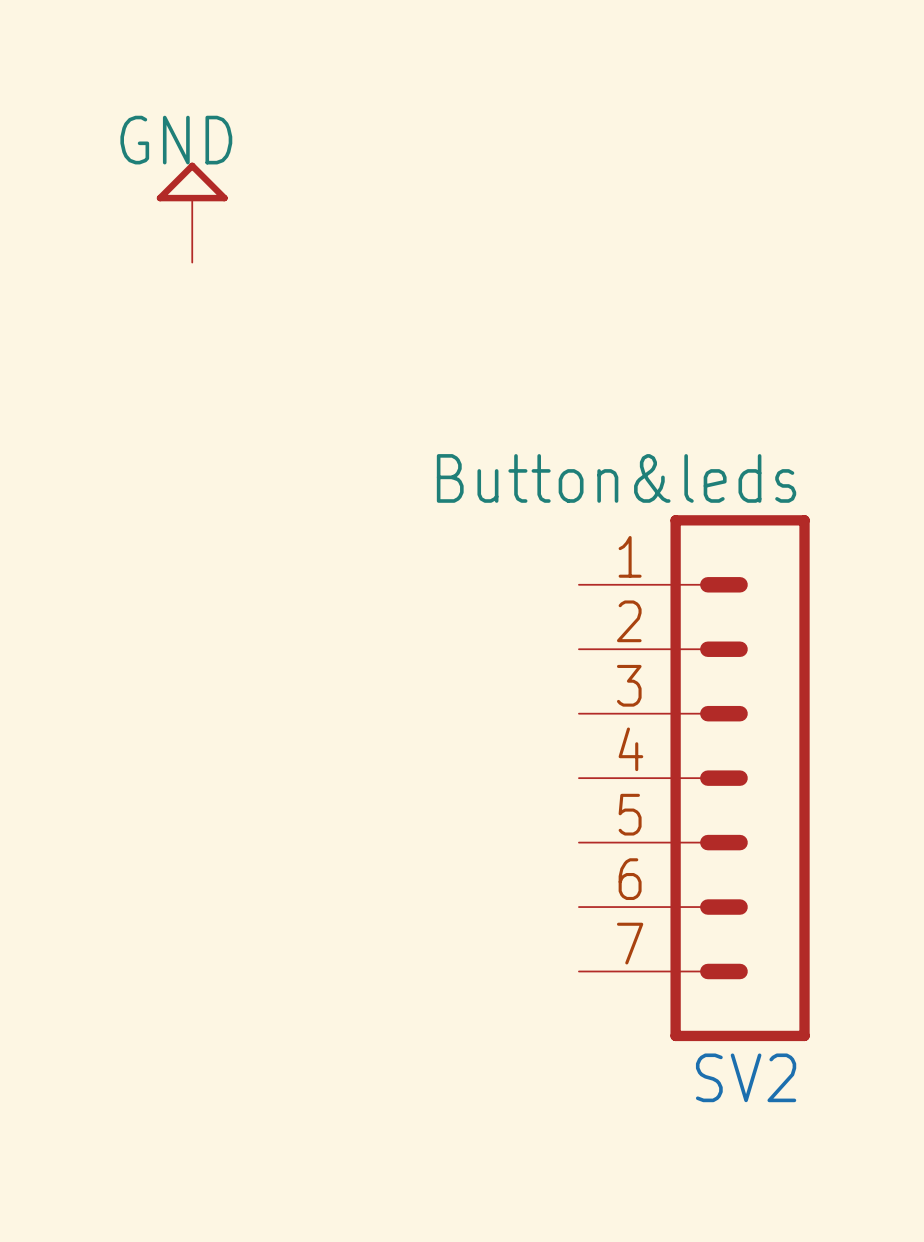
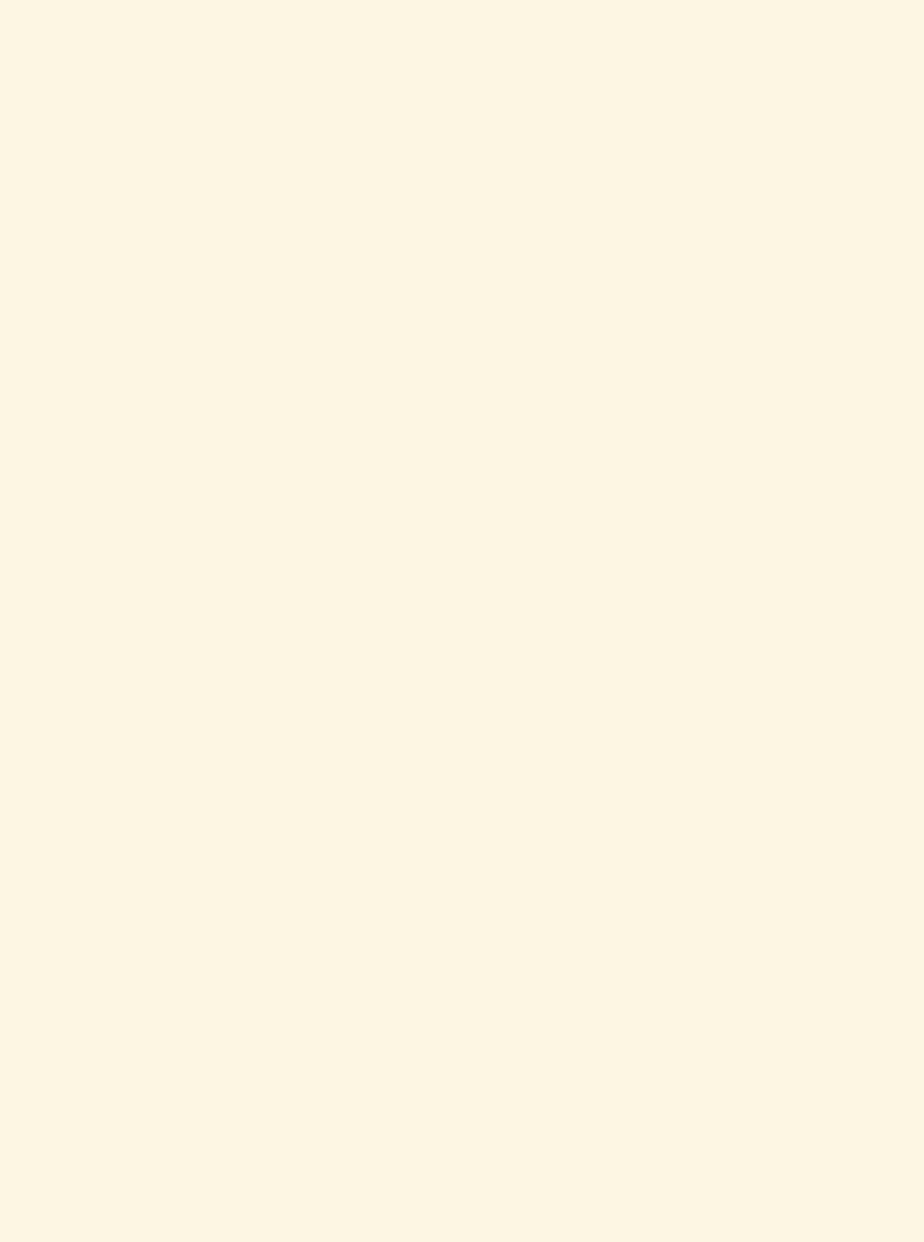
power symbol: GND (192, 212) -> none
SV2: Button&leds (694, 778) -> none

